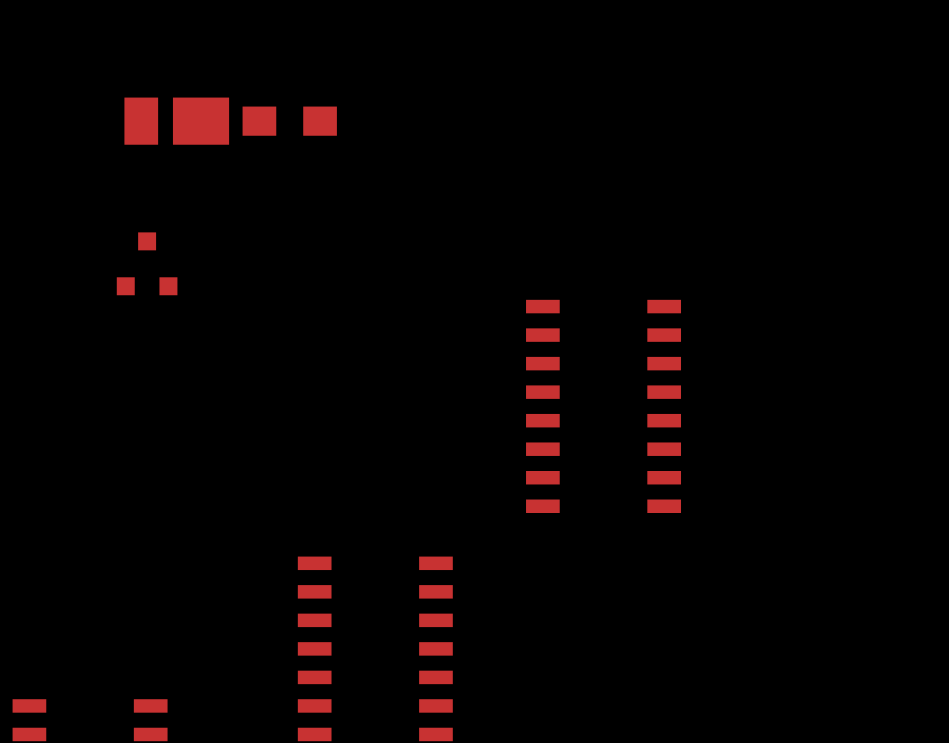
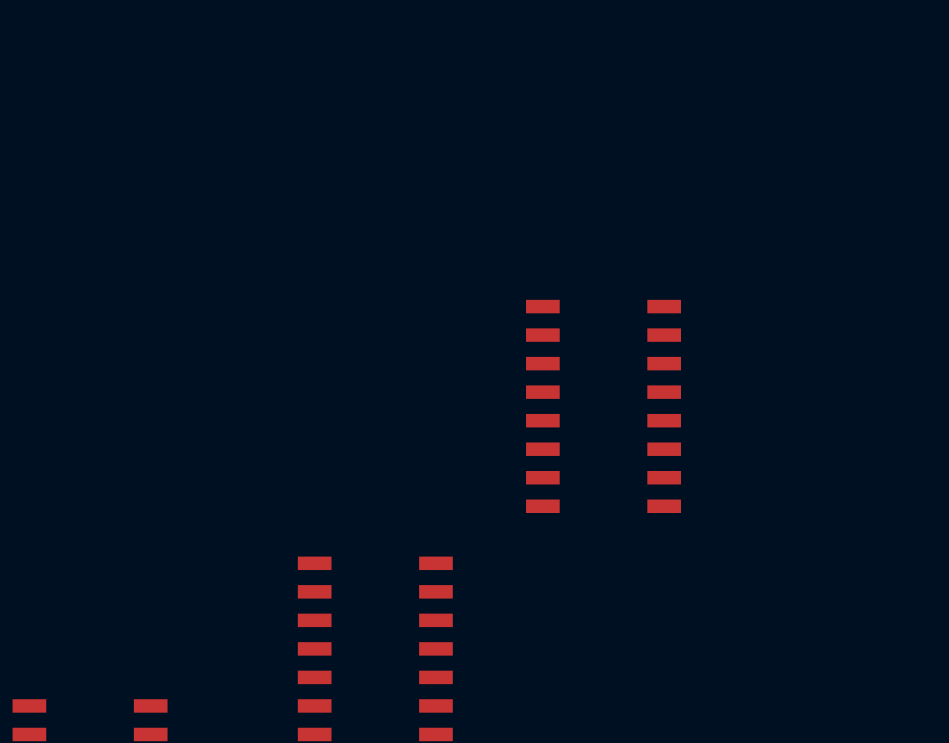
part: (176, 121) -> none
part: (289, 121) -> none
part: (147, 263) -> none

